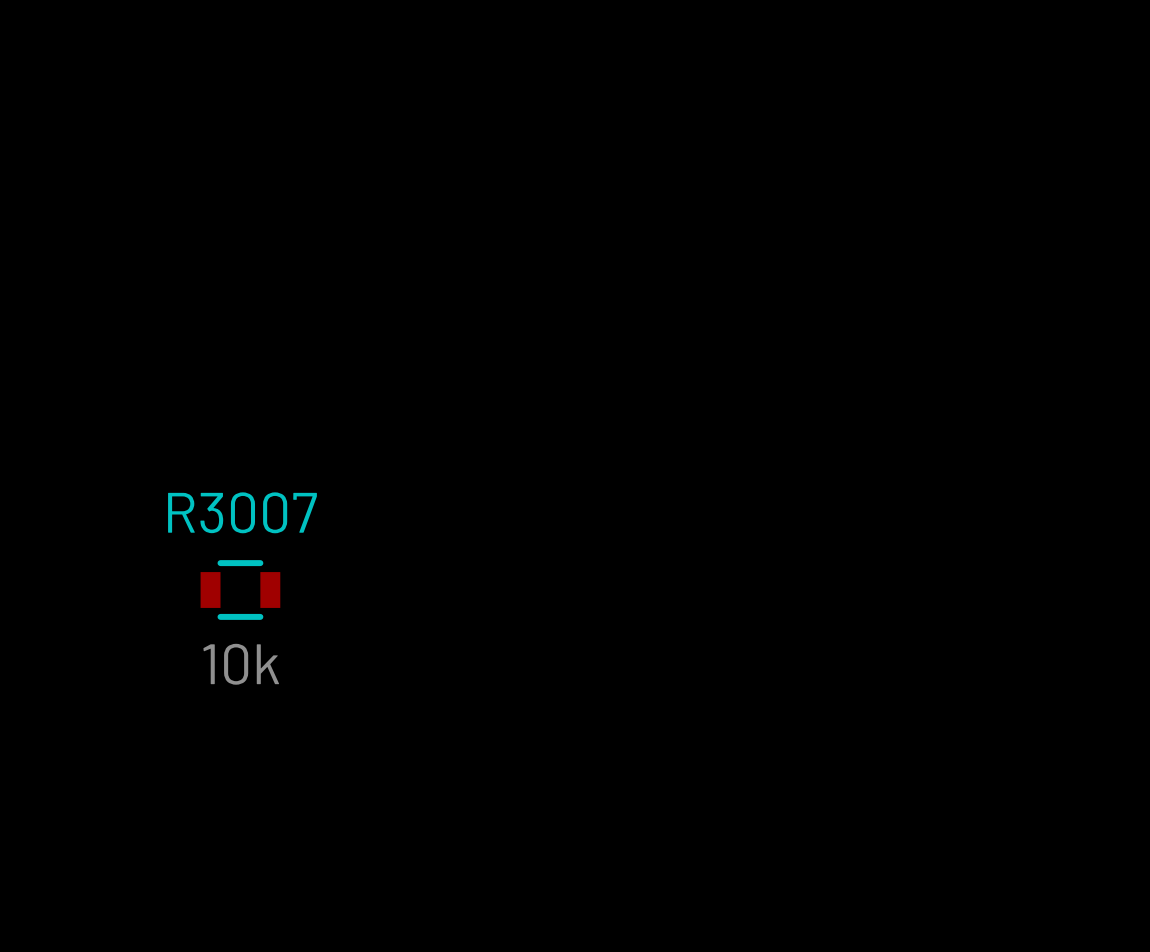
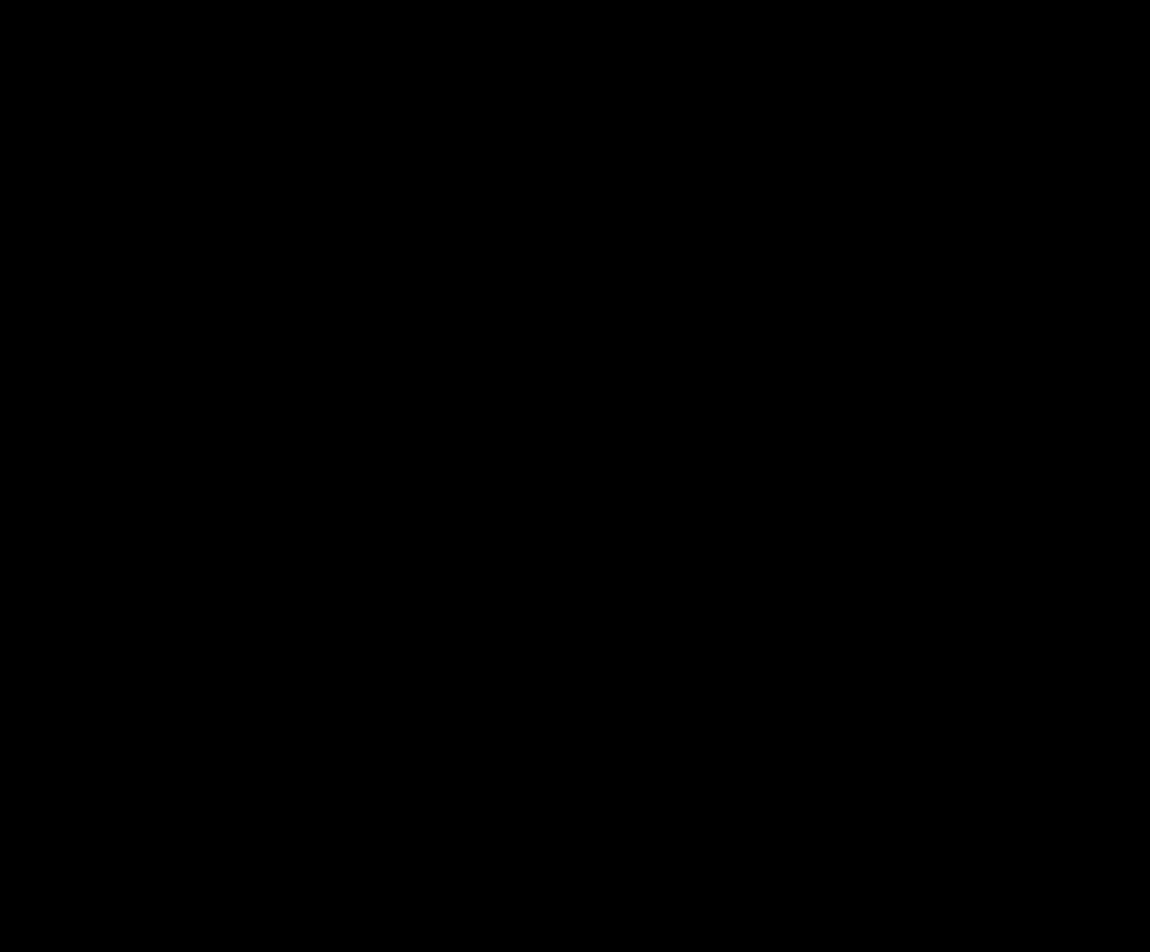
R3007: 10k (240, 590) -> none

